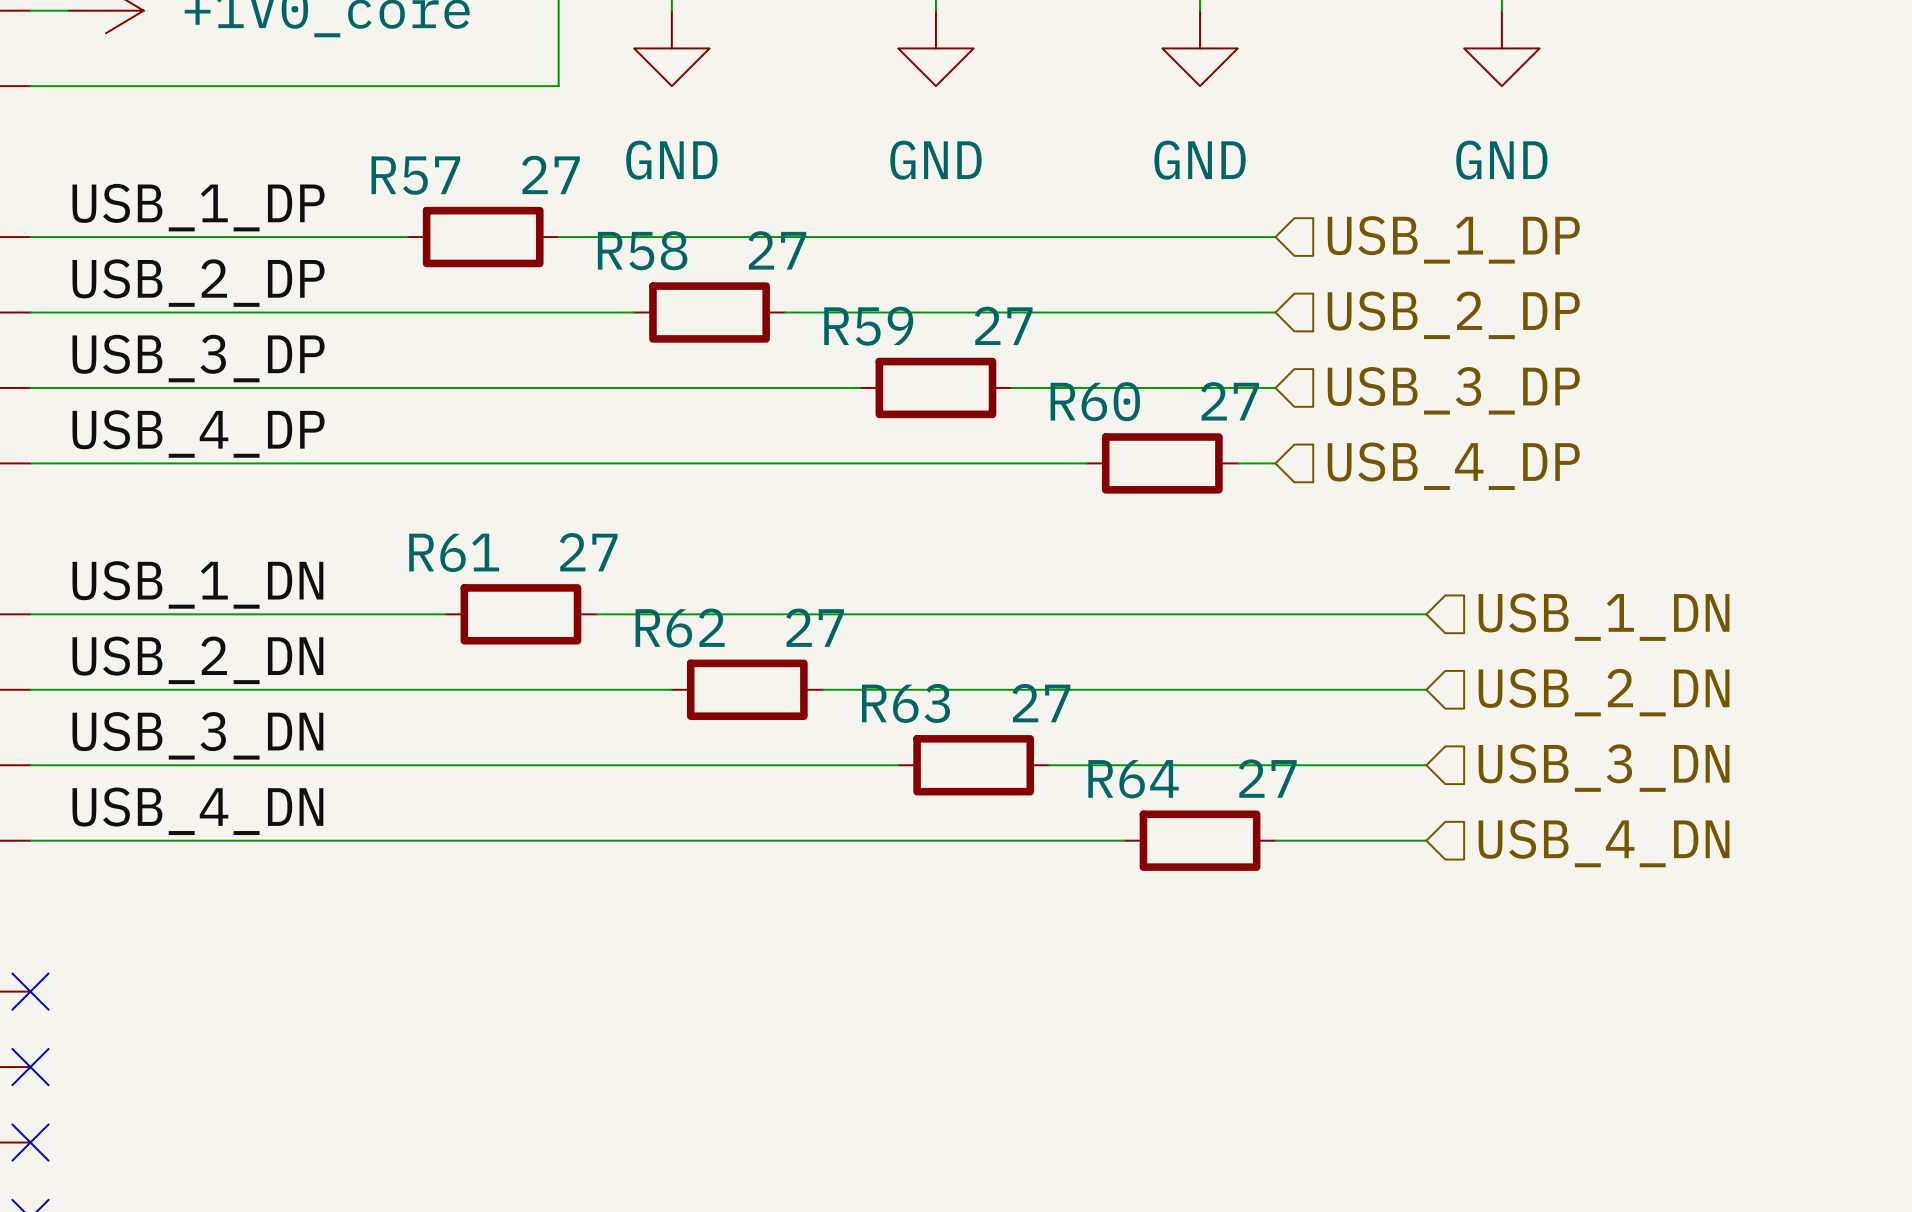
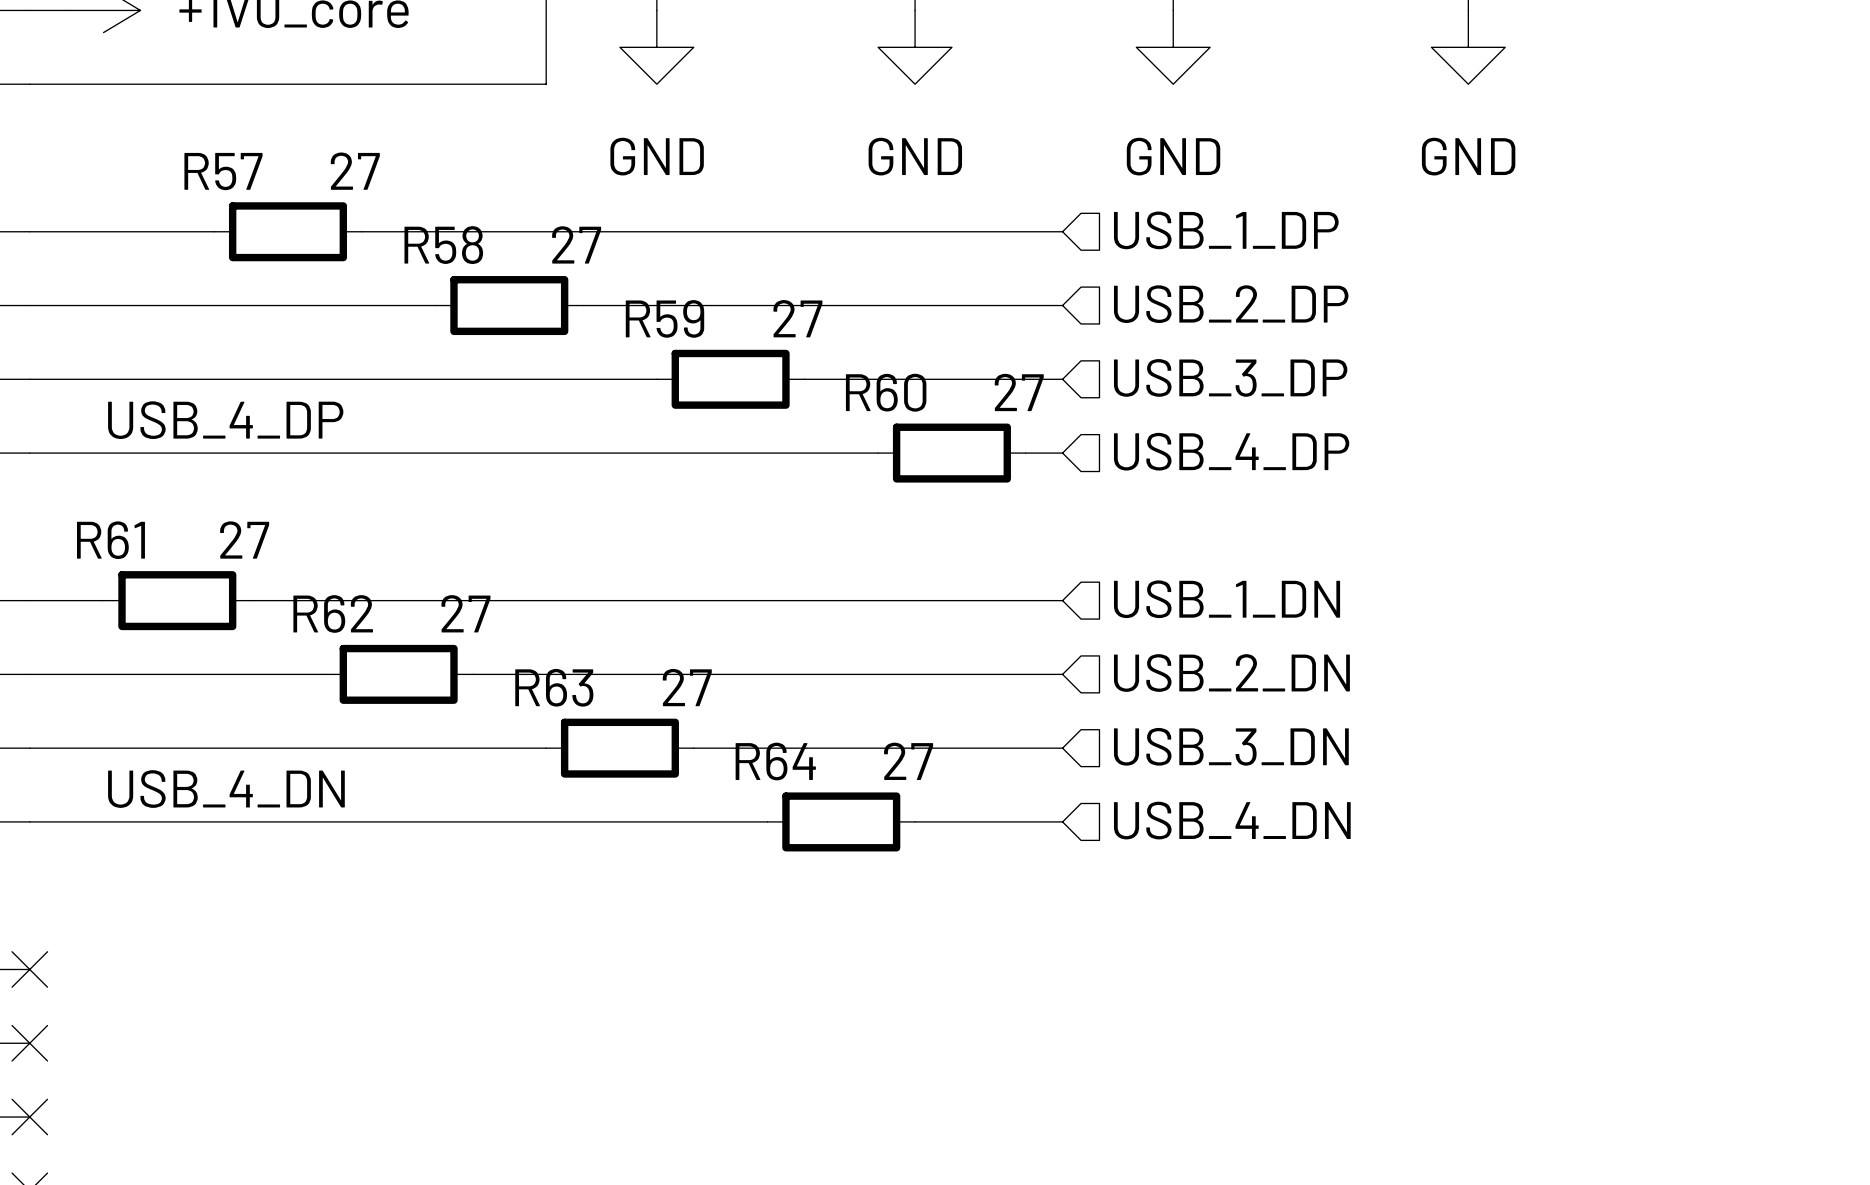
label: USB_1_DP (198, 207) -> none
wire: (219, 237) (370, 237) -> none
R57 position: (483, 237) -> (287, 231)
wire: (1086, 237) (1275, 237) -> none
hierarchical label position: USB_1_DP (1453, 239) -> USB_1_DP (1226, 230)
label: USB_2_DP (198, 283) -> none
wire: (445, 312) (596, 312) -> (398, 231) (546, 231)
R58 position: (709, 312) -> (509, 305)
wire: (1086, 312) (1275, 312) -> none
hierarchical label position: USB_2_DP (1453, 315) -> USB_2_DP (1231, 304)
label: USB_3_DP (198, 358) -> none
wire: (671, 387) (822, 387) -> (619, 305) (767, 305)
R59 position: (935, 387) -> (730, 379)
wire: (1086, 387) (1275, 387) -> none
hierarchical label position: USB_3_DP (1453, 390) -> USB_3_DP (1230, 377)
label position: USB_4_DP (198, 433) -> USB_4_DP (225, 420)
wire: (898, 463) (1049, 463) -> (841, 379) (988, 379)
R60 position: (1162, 463) -> (951, 453)
wire: (1237, 463) (1275, 463) -> none
hierarchical label position: USB_4_DP (1453, 466) -> USB_4_DP (1231, 451)
label: USB_1_DN (197, 584) -> none
wire: (105, 614) (256, 614) -> none
R61 position: (520, 614) -> (177, 600)
wire: (1086, 614) (1426, 614) -> none
hierarchical label position: USB_1_DN (1604, 617) -> USB_1_DN (1227, 599)
label: USB_2_DN (197, 660) -> none
wire: (332, 689) (483, 689) -> (435, 600) (583, 600)
R62 position: (747, 689) -> (398, 674)
wire: (1086, 689) (1426, 689) -> none
hierarchical label position: USB_2_DN (1604, 692) -> USB_2_DN (1231, 673)
label: USB_3_DN (197, 735) -> none
wire: (558, 765) (709, 765) -> (656, 674) (804, 674)
R63 position: (973, 765) -> (619, 748)
wire: (1086, 765) (1426, 765) -> none
hierarchical label position: USB_3_DN (1604, 768) -> USB_3_DN (1231, 746)
label position: USB_4_DN (197, 811) -> USB_4_DN (226, 789)
wire: (785, 840) (935, 840) -> (878, 748) (1025, 748)
wire: (1086, 840) (1124, 840) -> none
R64 position: (1200, 840) -> (841, 821)
wire: (1275, 840) (1426, 840) -> none
hierarchical label position: USB_4_DN (1604, 843) -> USB_4_DN (1232, 820)

